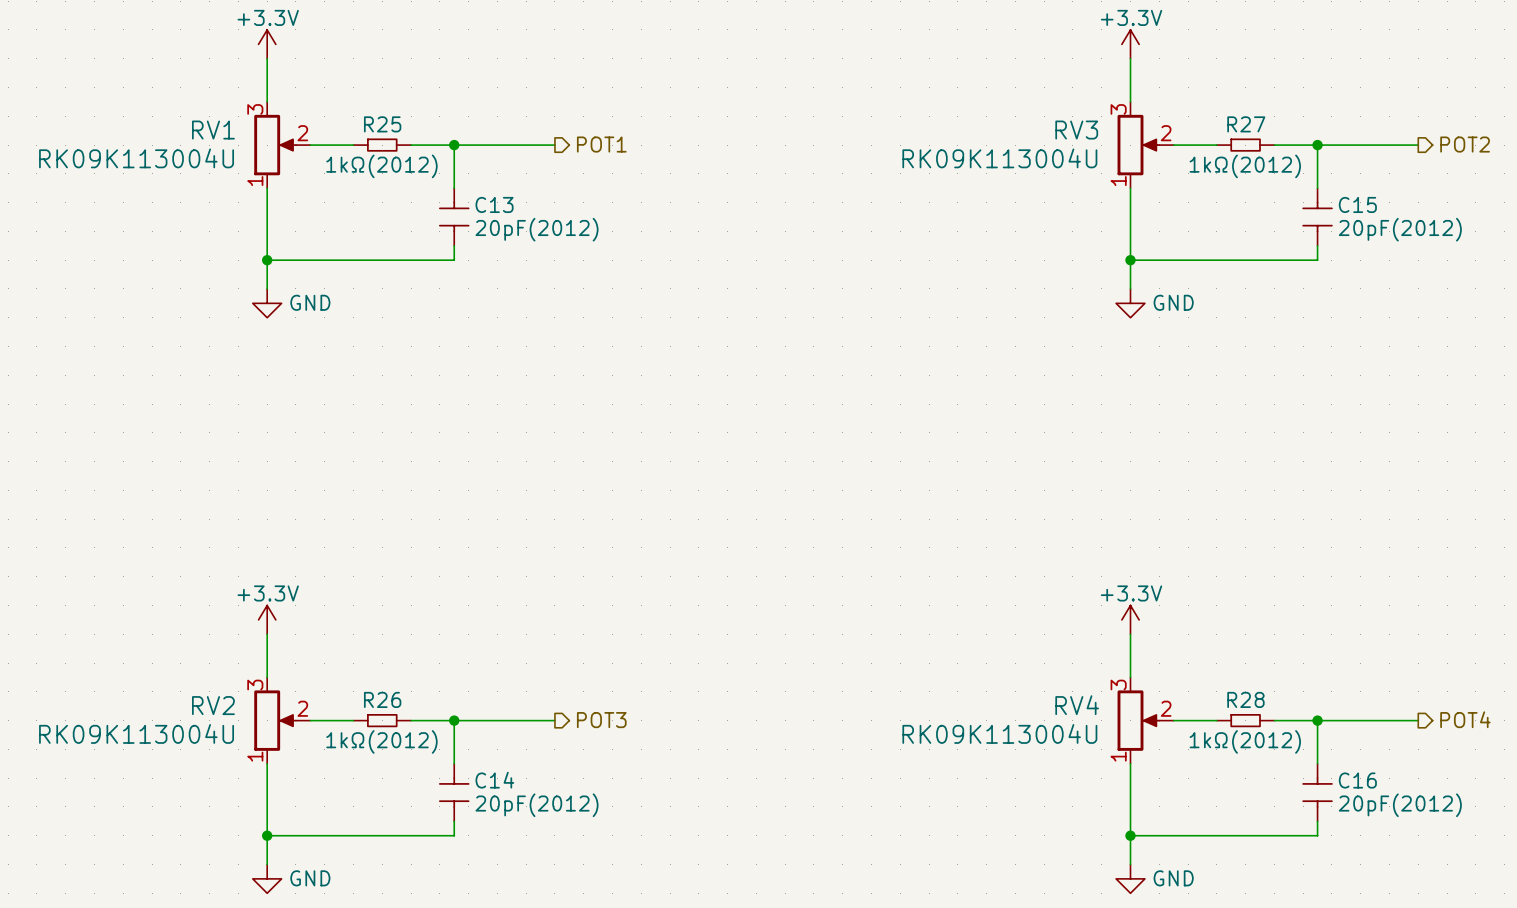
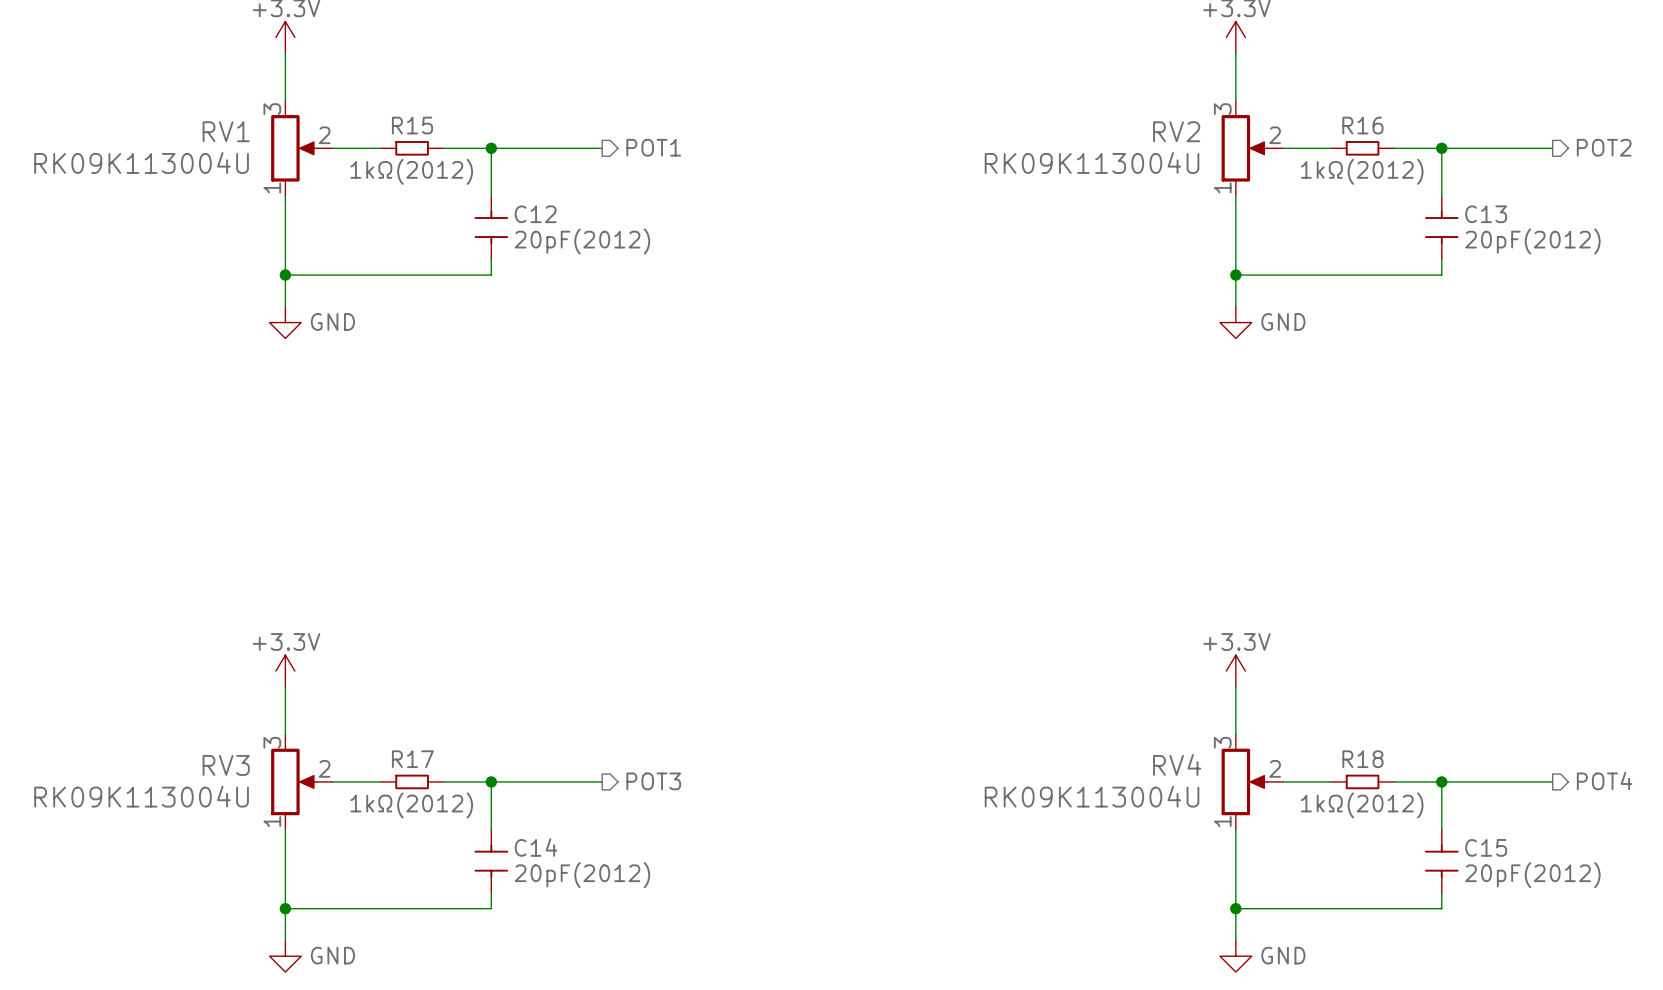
R25 name: R25 (382, 124) -> R15 (412, 125)
R27 name: R27 (1246, 124) -> R16 (1362, 125)
RV3 name: RV3 (1076, 130) -> RV2 (1176, 131)
C13 name: C13 (494, 204) -> C12 (535, 214)
C15 name: C15 (1357, 204) -> C13 (1486, 214)
R26 name: R26 (382, 699) -> R17 (412, 759)
R28 name: R28 (1245, 699) -> R18 (1362, 759)
RV2 name: RV2 (213, 705) -> RV3 (226, 765)
C16 name: C16 (1357, 780) -> C15 (1486, 847)

